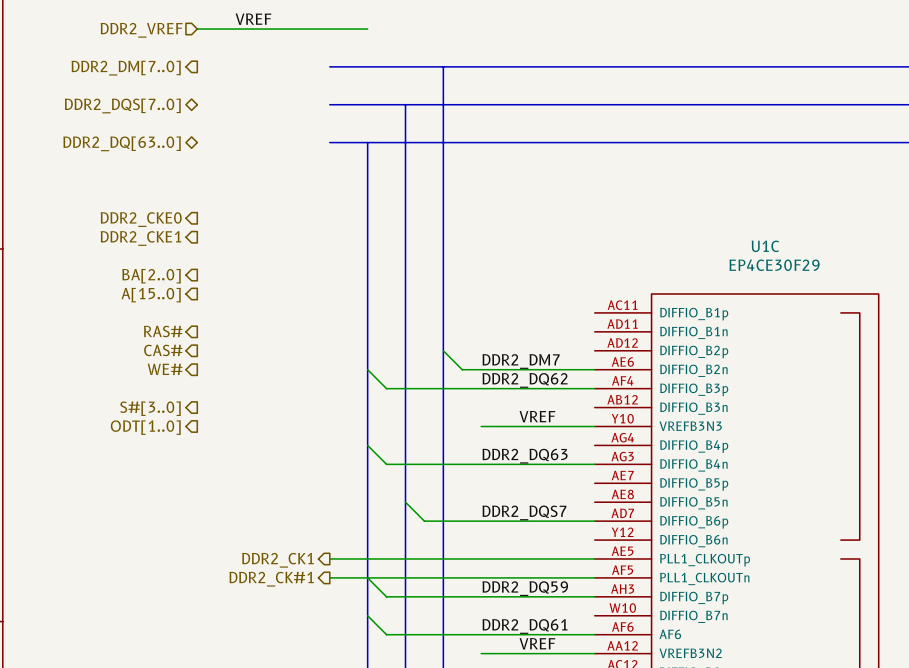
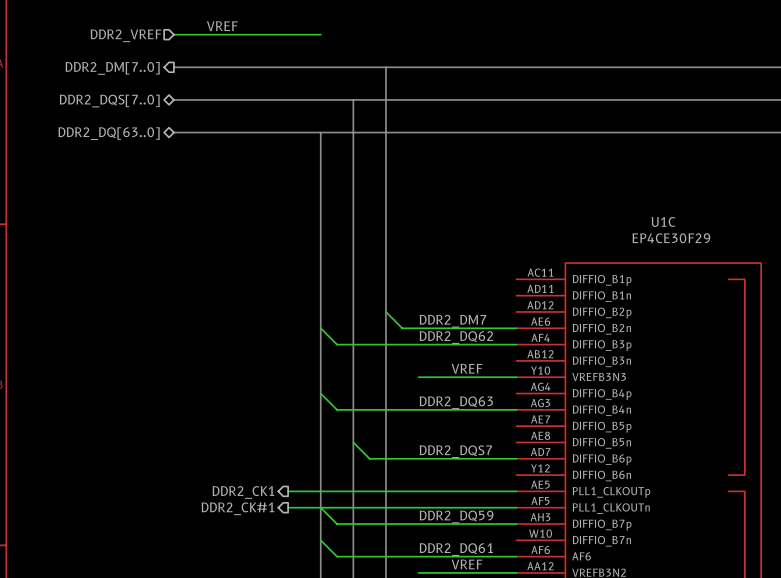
bus: none -> (173, 67) (288, 67)
bus: none -> (173, 99) (288, 99)
bus: none -> (173, 132) (288, 132)
hierarchical label: DDR2_CKE0 (141, 219) -> none
hierarchical label: DDR2_CKE1 (140, 238) -> none
hierarchical label: BA[2..0] (151, 276) -> none
hierarchical label: A[15..0] (151, 295) -> none
hierarchical label: RAS# (163, 331) -> none
hierarchical label: CAS# (163, 350) -> none
hierarchical label: WE# (165, 369) -> none
hierarchical label: S#[3..0] (150, 408) -> none
hierarchical label: ODT[1..0] (145, 427) -> none

